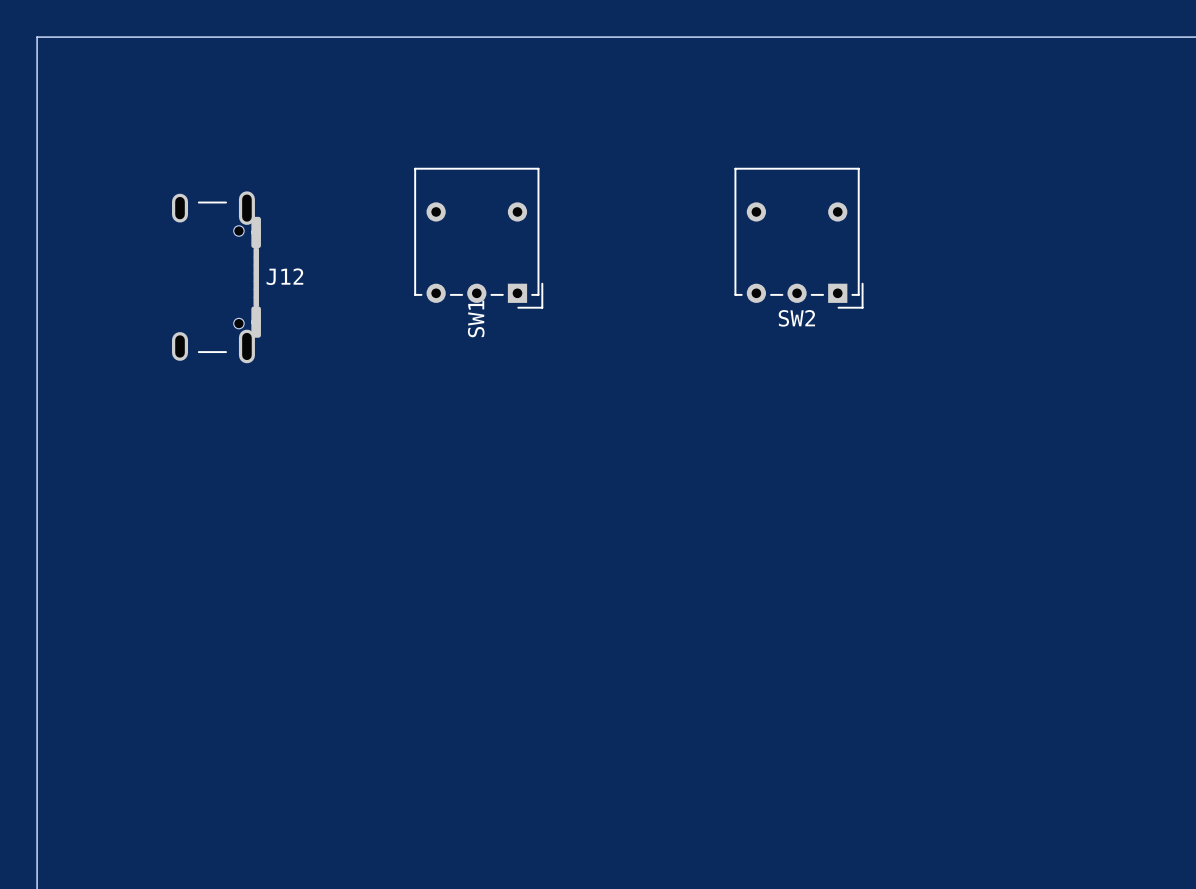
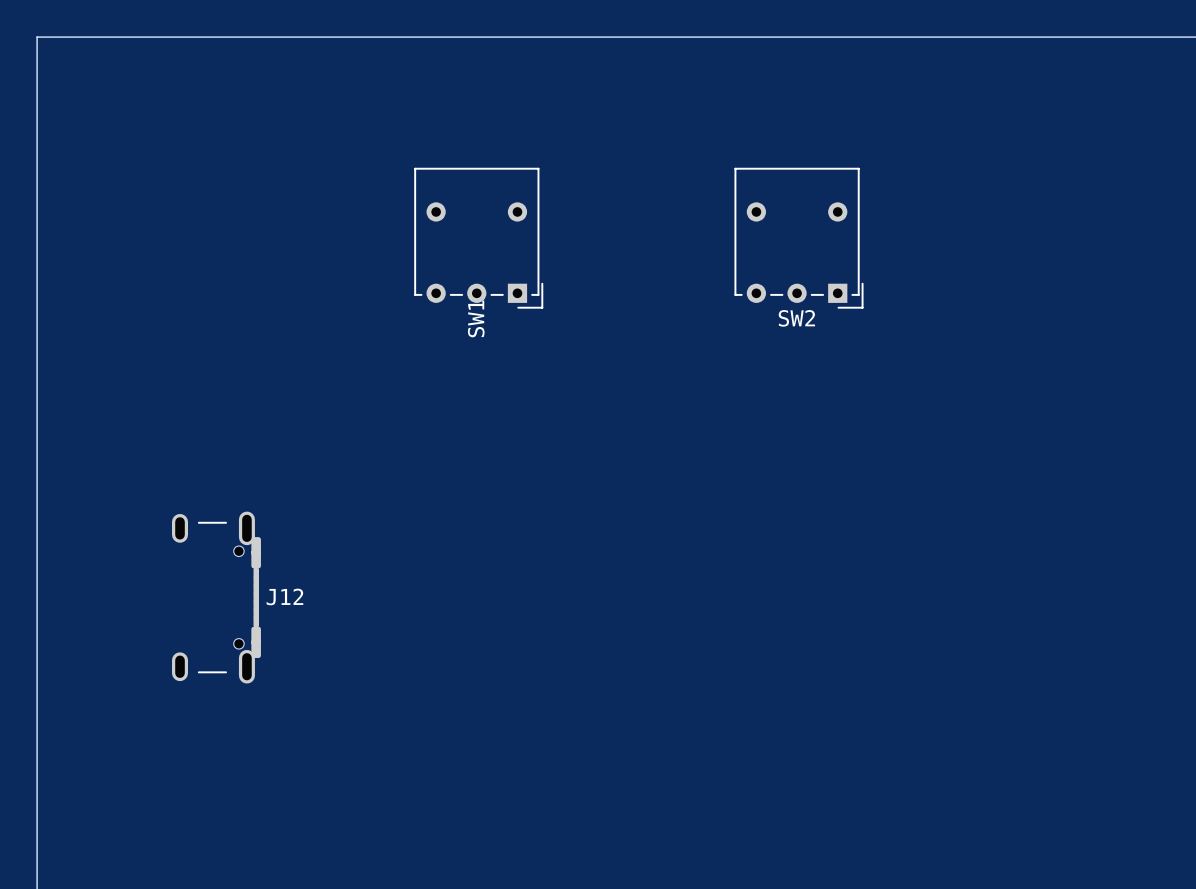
J12 position: (216, 277) -> (216, 597)

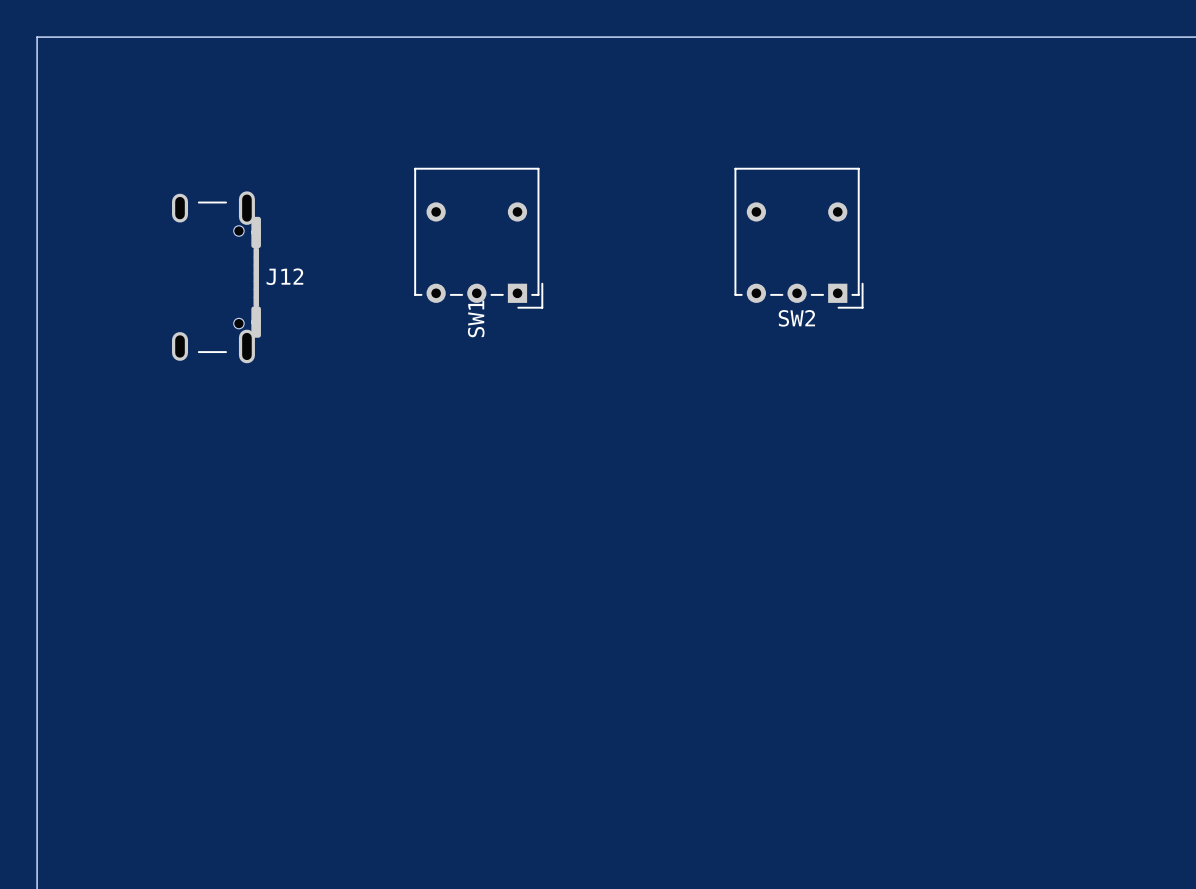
J12 position: (216, 597) -> (216, 277)

